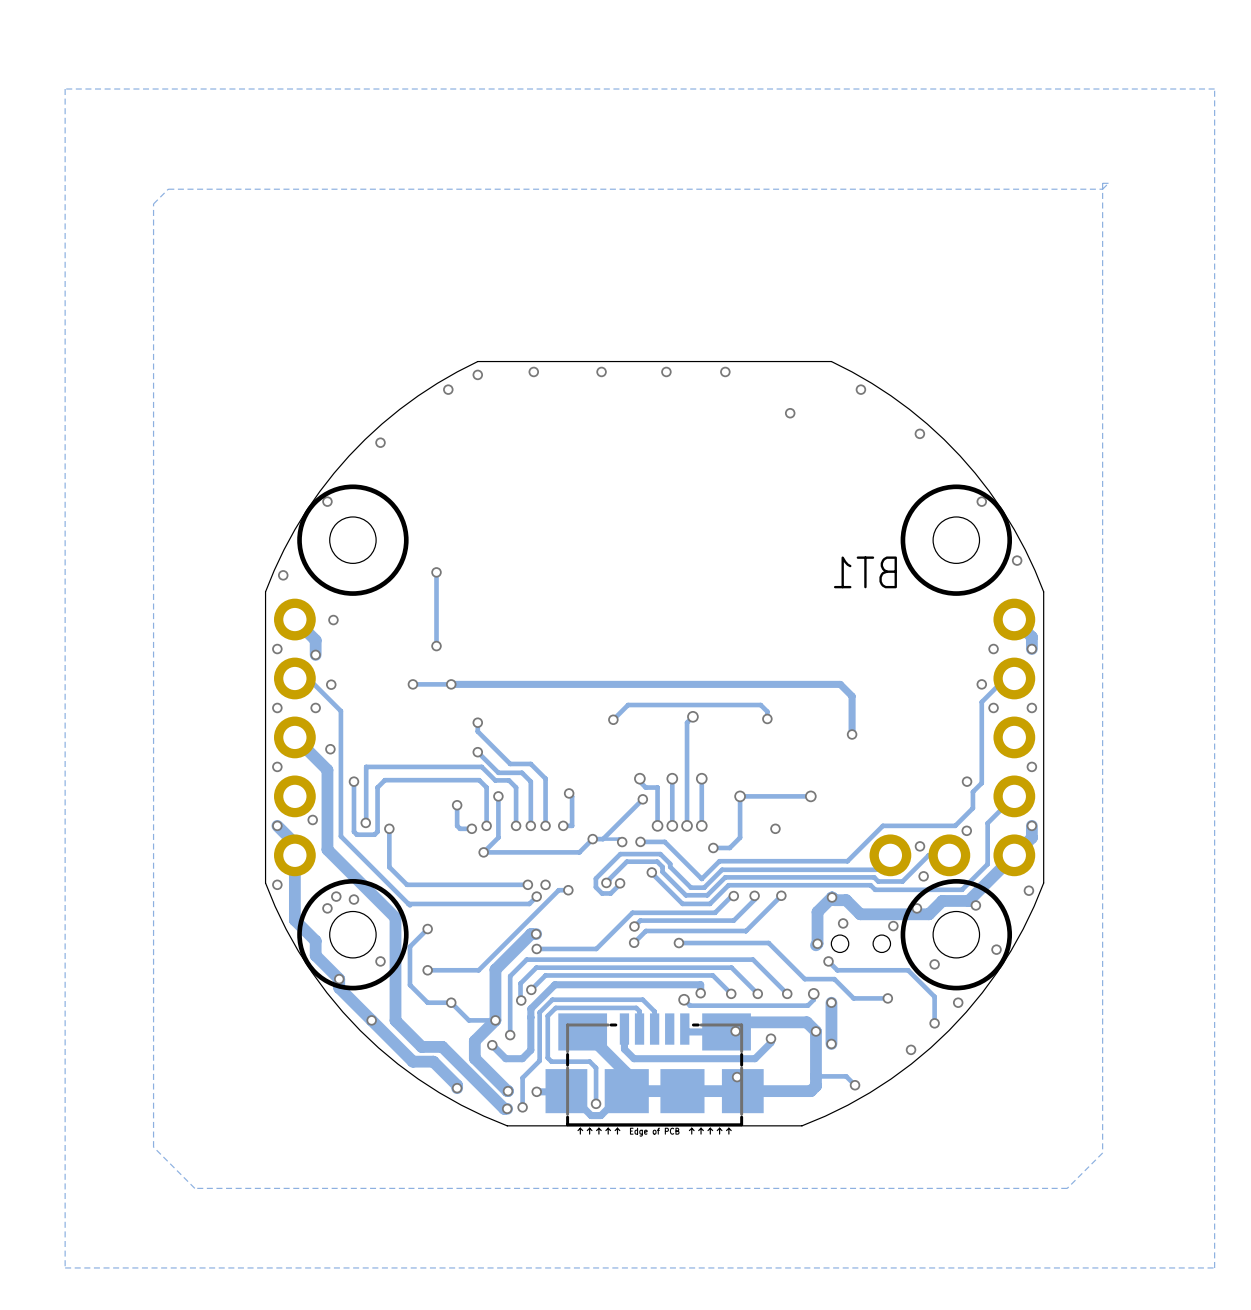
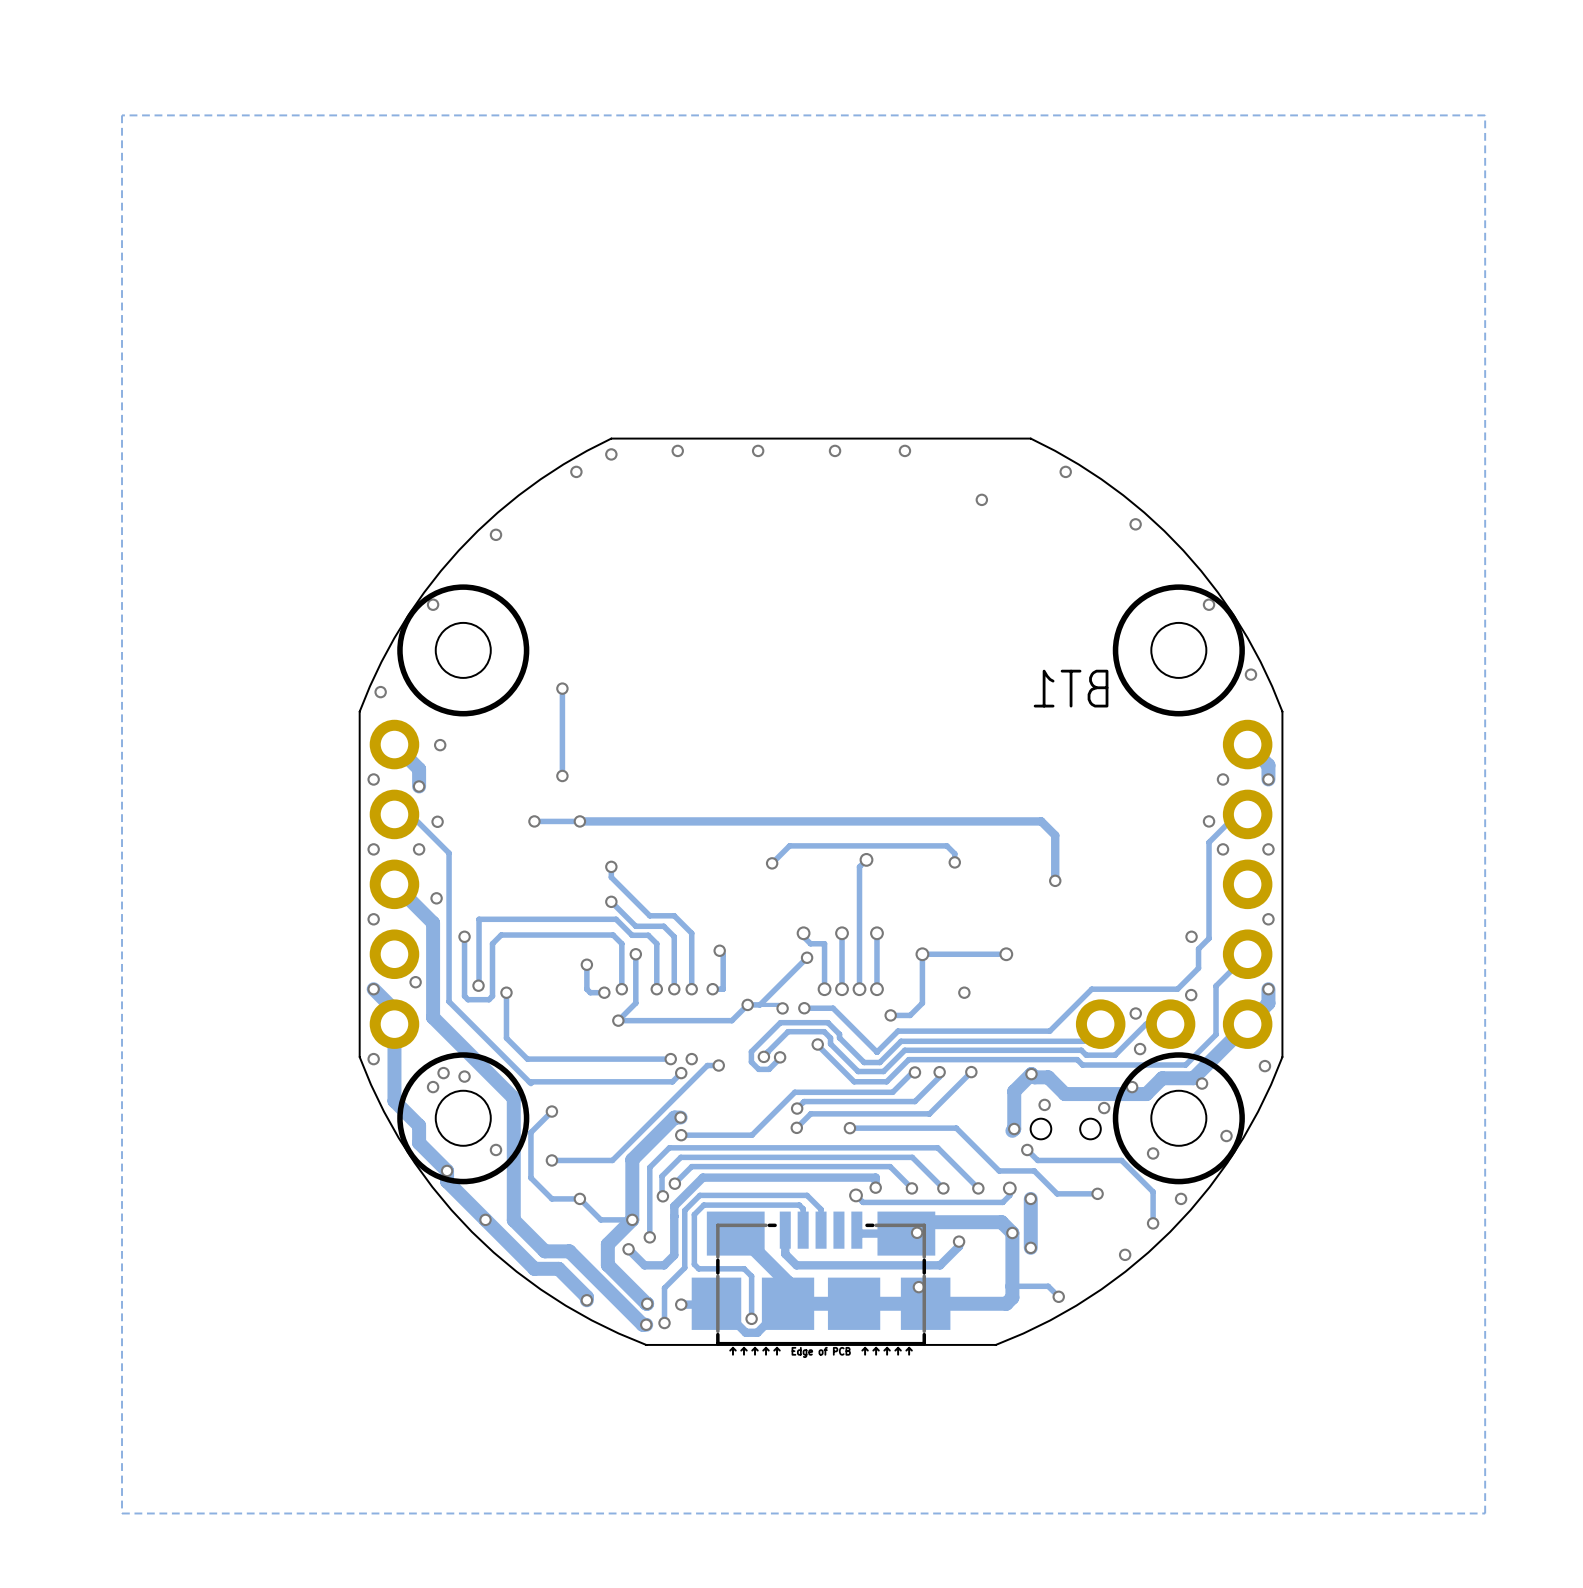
zone outline: (1108, 183) (1102, 189) (168, 189) (153, 203) (153, 1147) (194, 1188) (1067, 1188) (1102, 1153) (1102, 183) (1108, 183) -> none

